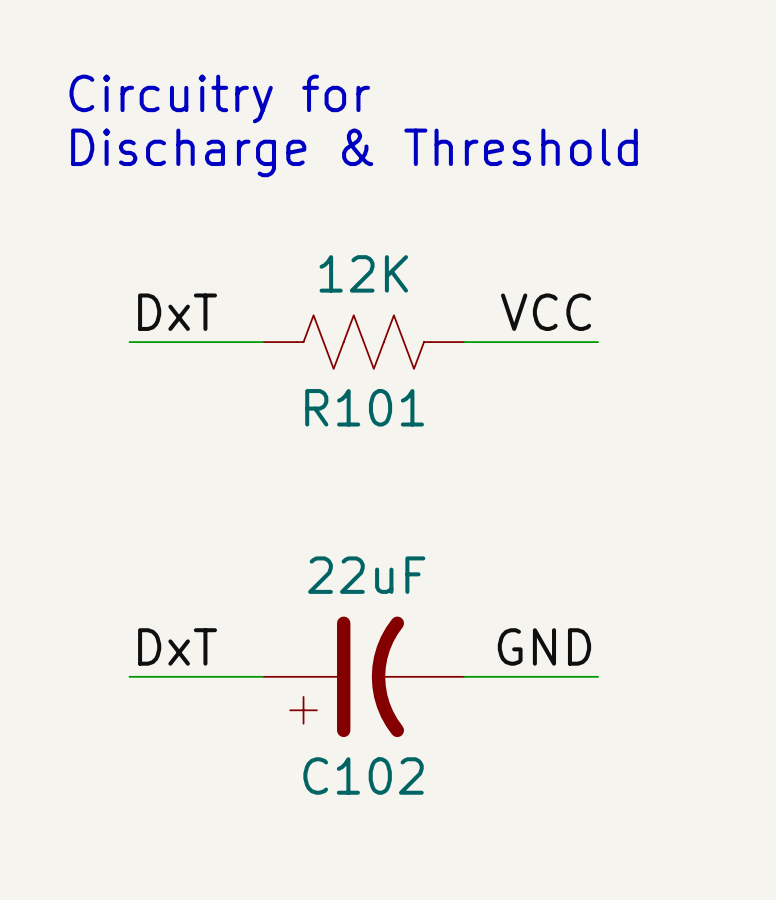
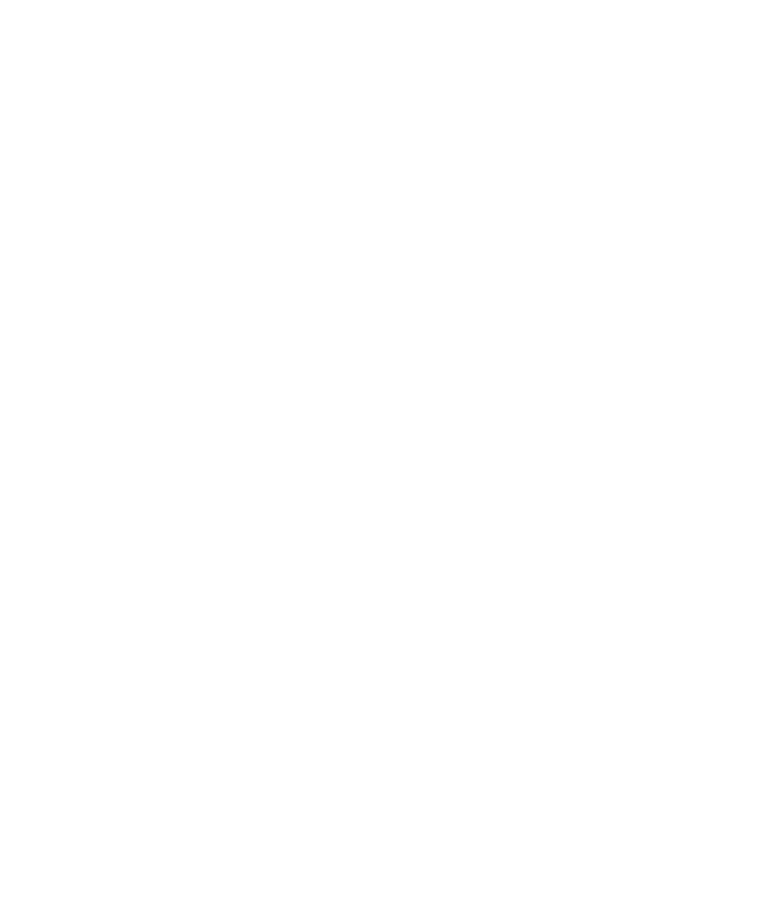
text: Circuitry for (219, 98) -> none
text: Discharge & Threshold (354, 152) -> none
label: DxT (177, 312) -> none
label: VCC (546, 312) -> none
wire: (129, 342) (263, 342) -> none
R101: 12K (363, 342) -> none
wire: (464, 342) (598, 342) -> none
label: DxT (177, 646) -> none
label: GND (544, 646) -> none
wire: (129, 676) (263, 676) -> none
C102: 22uF (363, 676) -> none
wire: (464, 676) (598, 676) -> none

